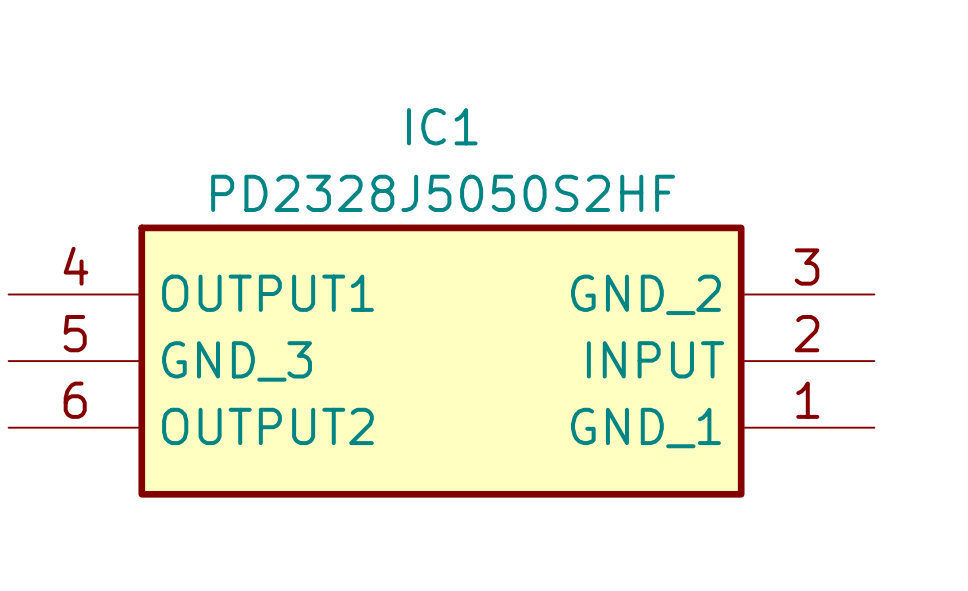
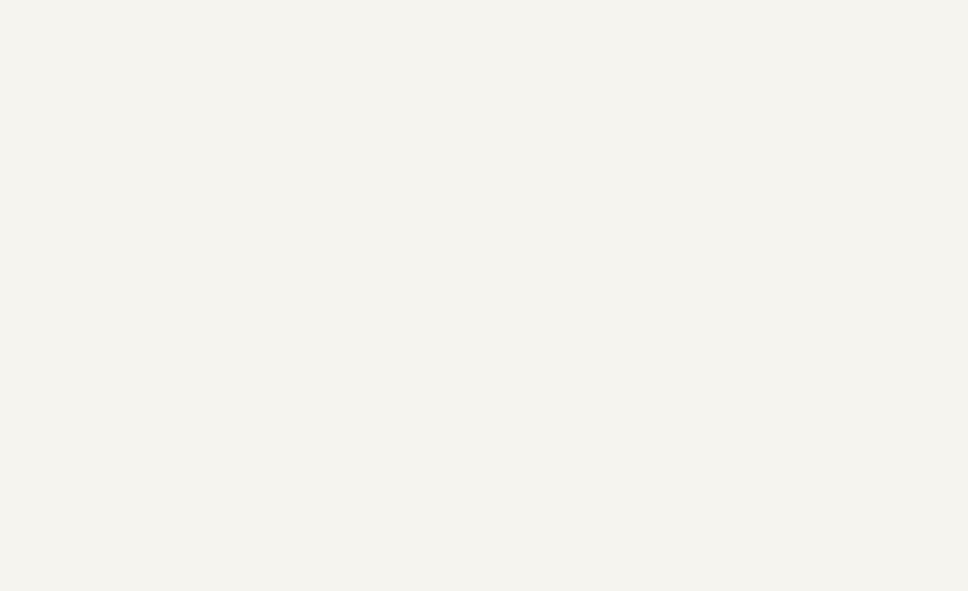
IC1: PD2328J5050S2HF (441, 361) -> none

